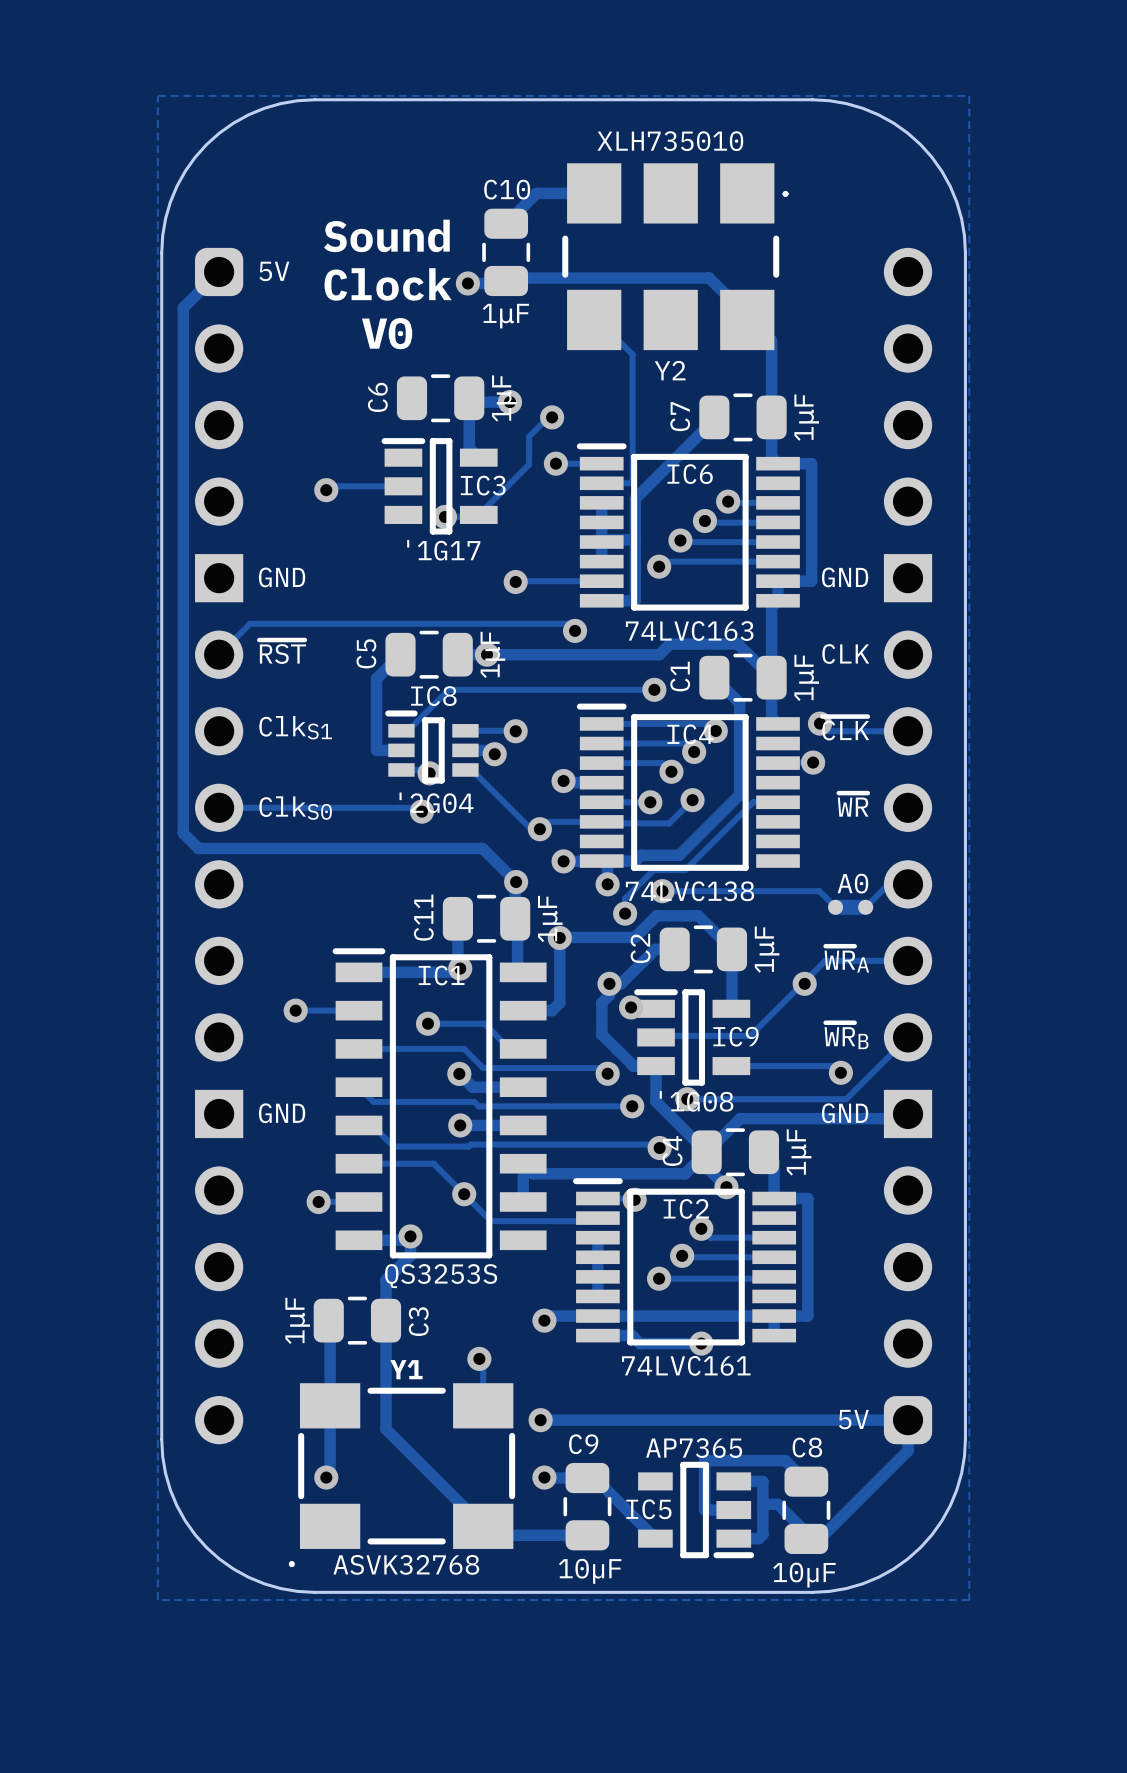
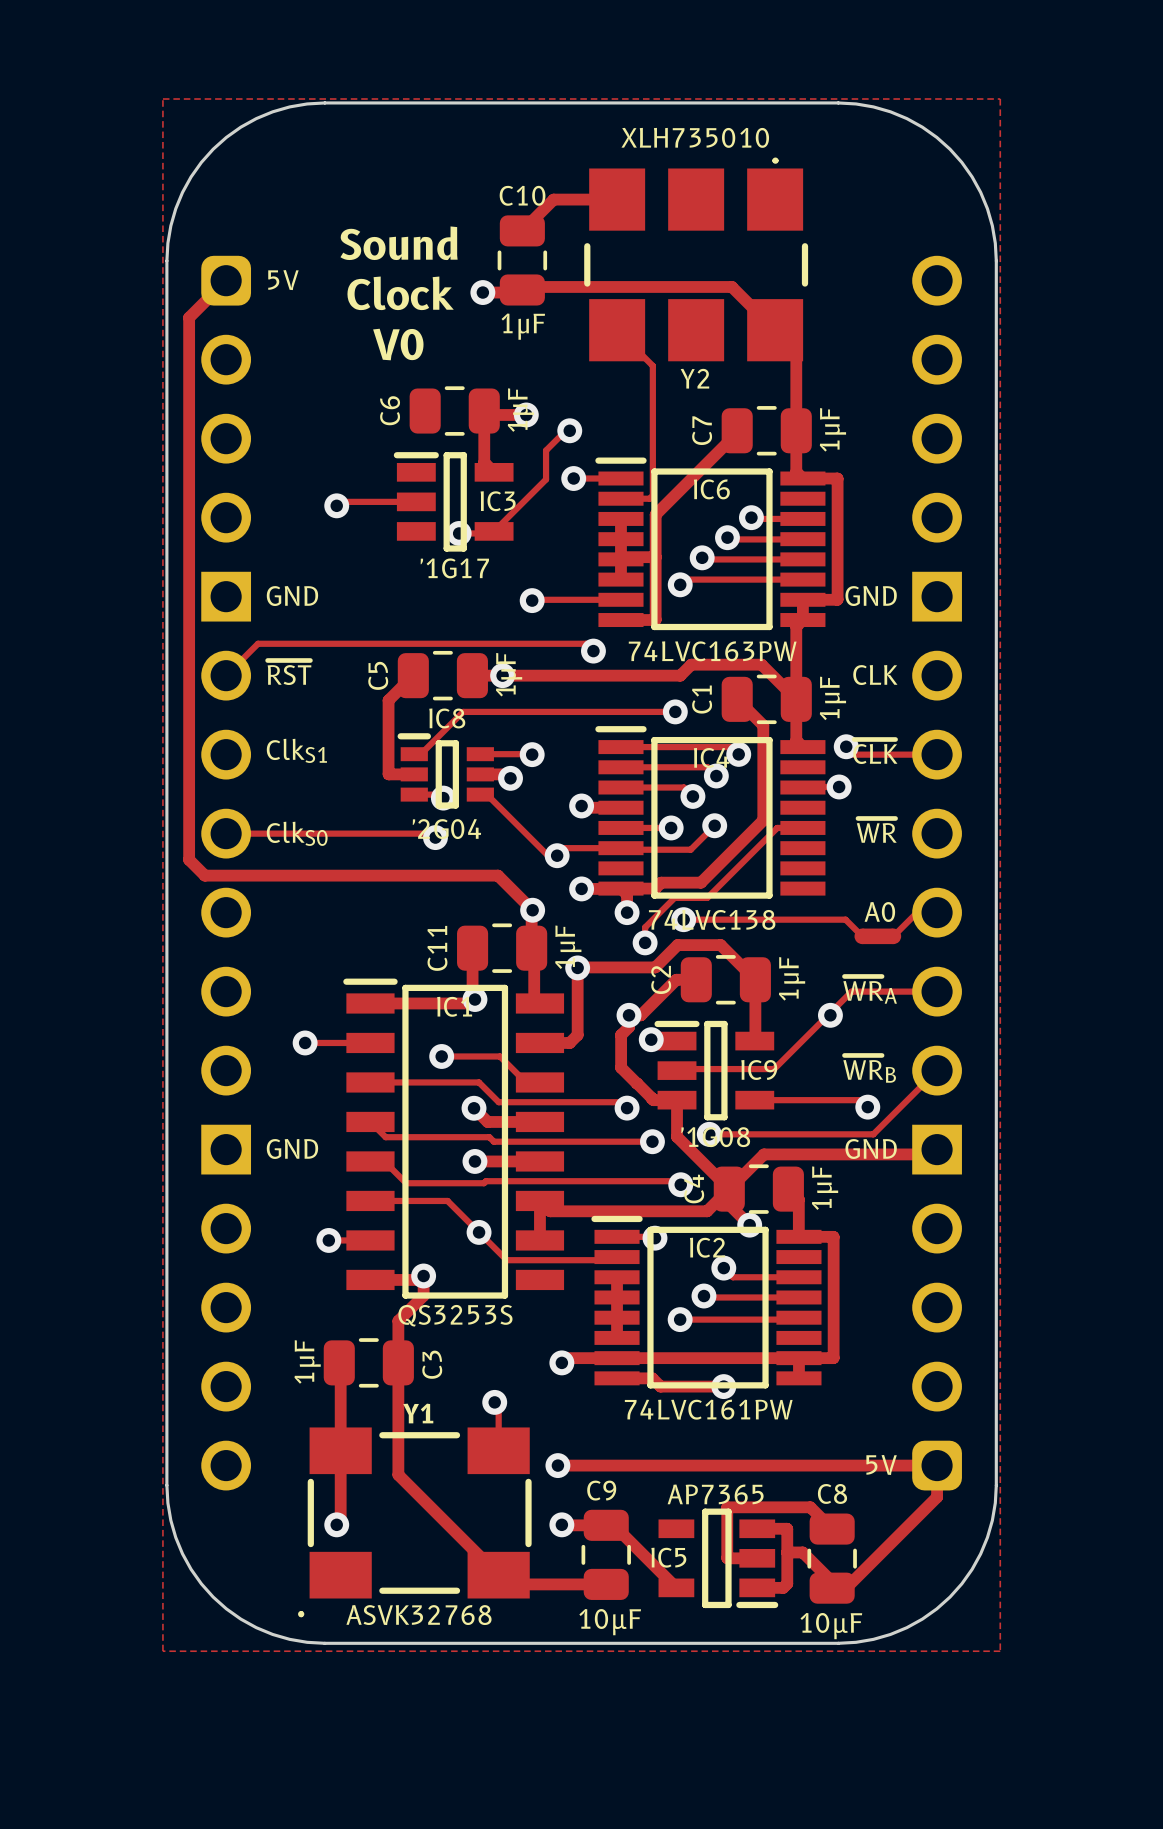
Y2 footprint: [562, 163, 789, 351] -> [584, 157, 809, 362]
IC6 text: 74LVC163 (689, 631) -> 74LVC163PW (712, 651)
IC2 text: 74LVC161 (686, 1365) -> 74LVC161PW (708, 1409)

